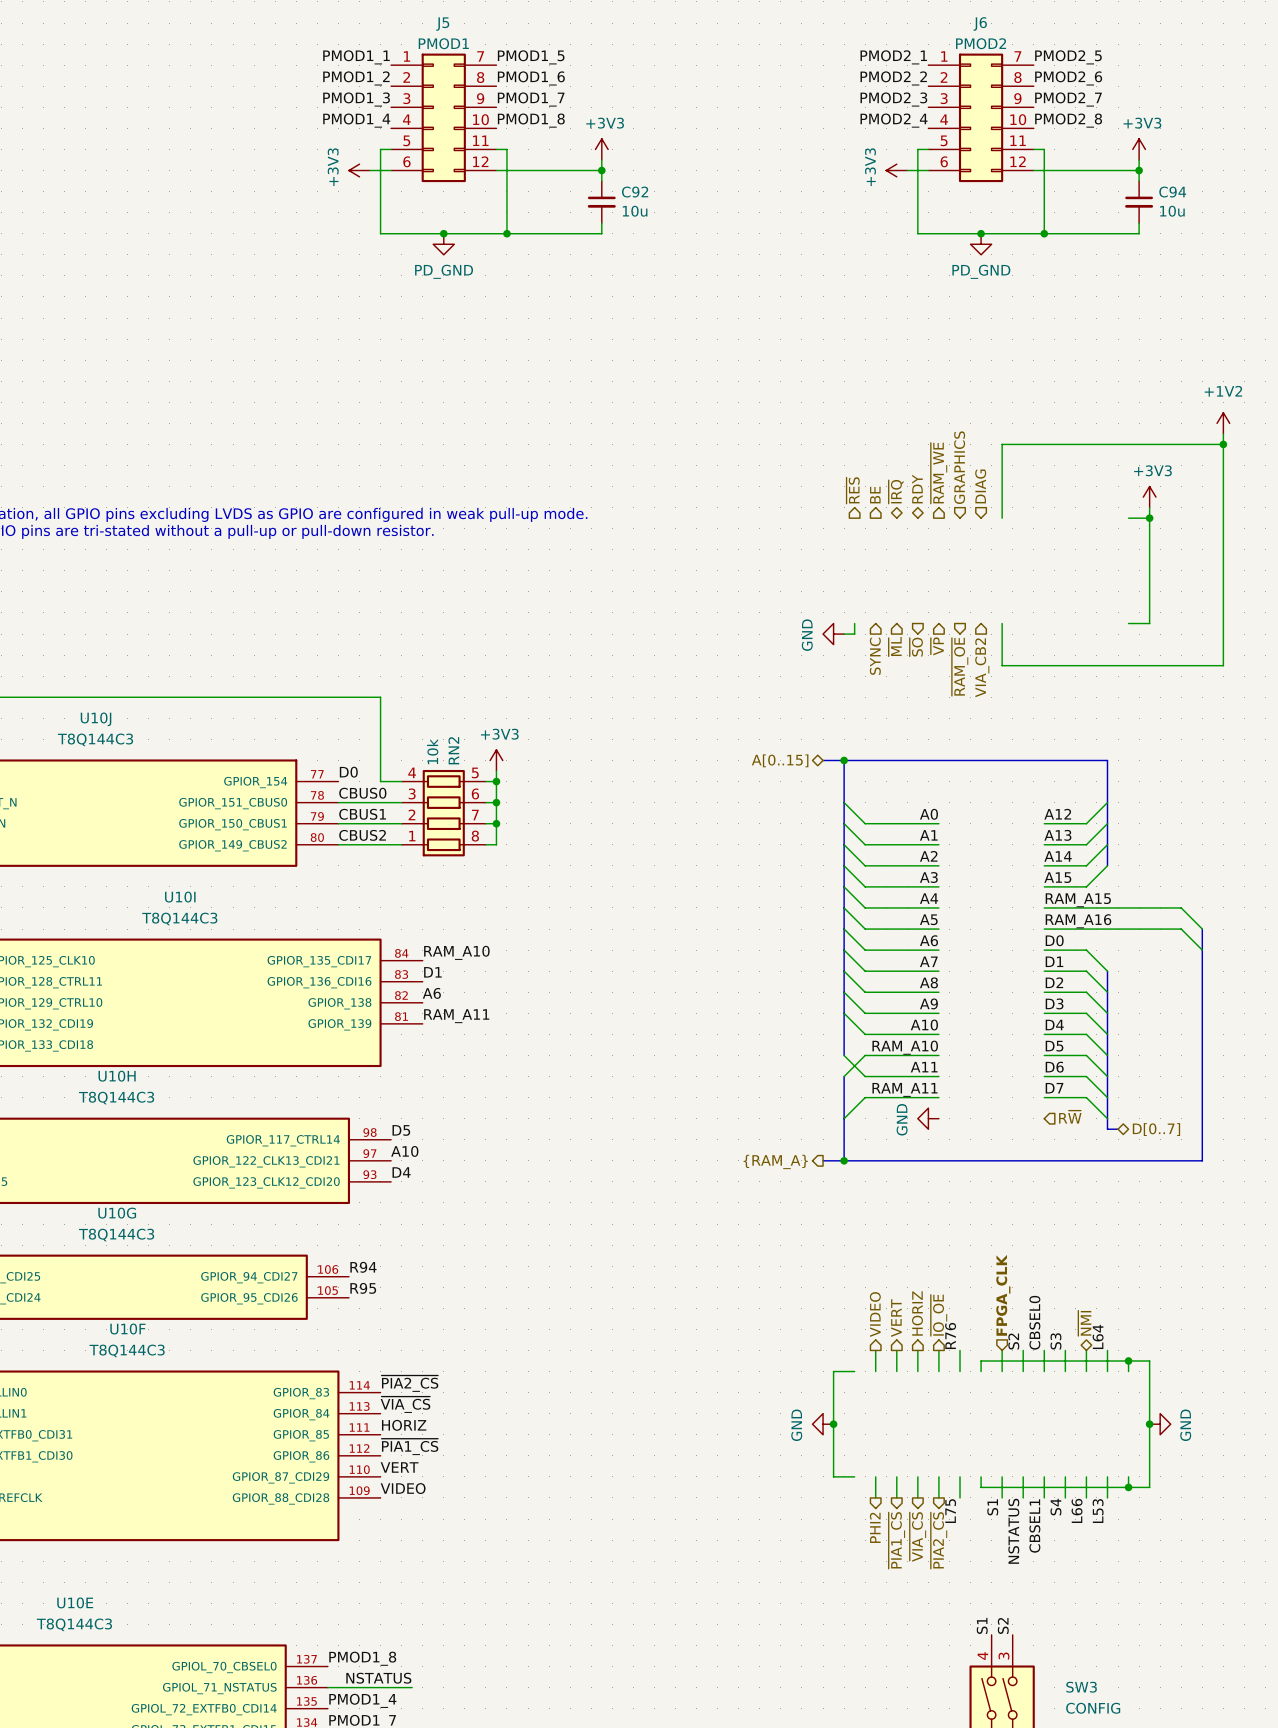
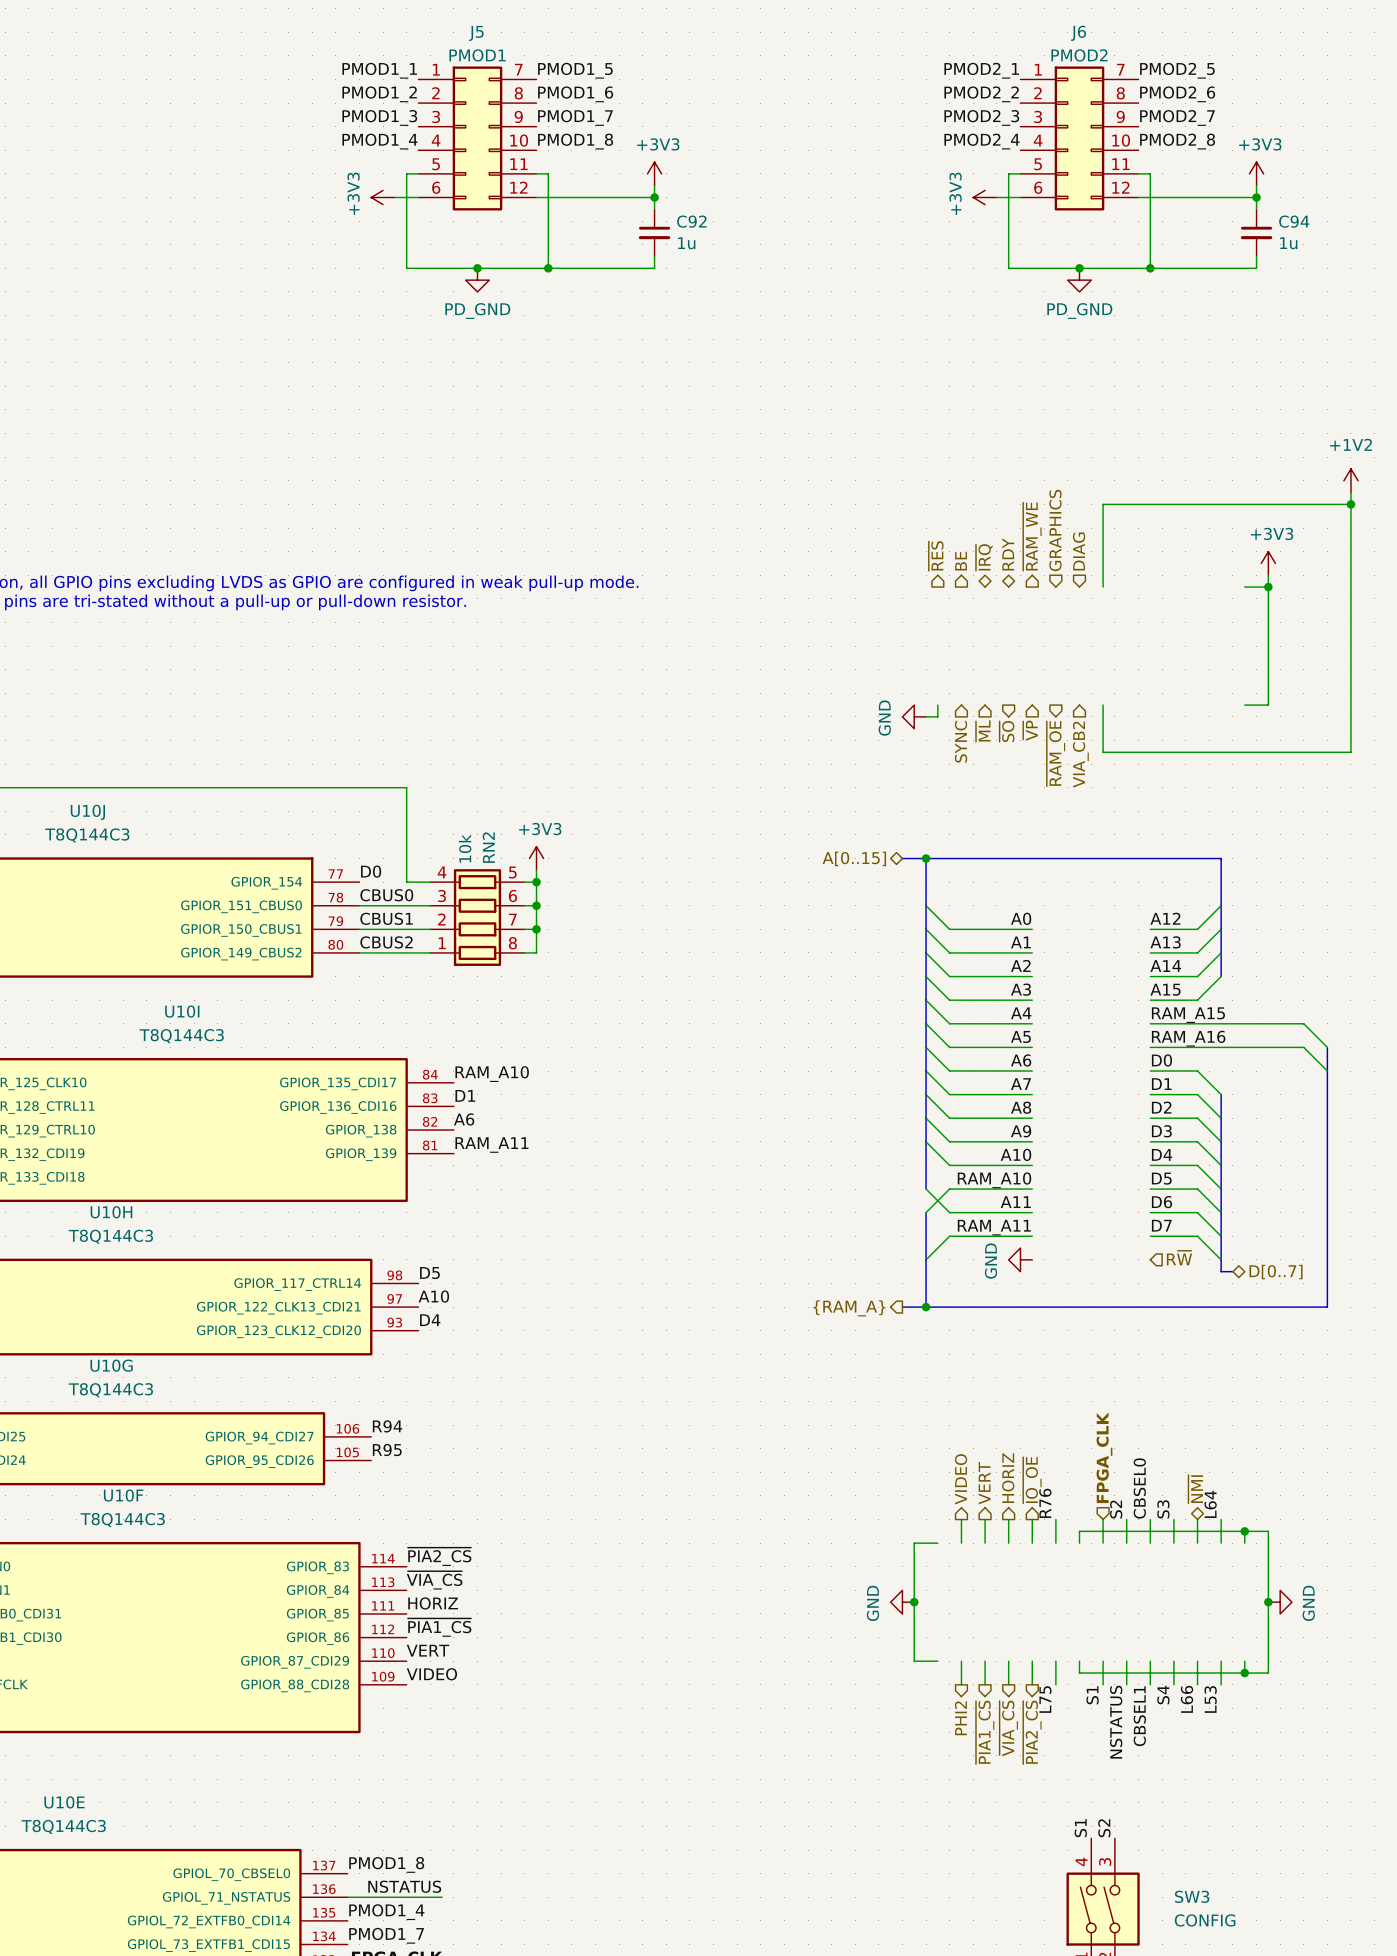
C92 value: 10u (635, 211) -> 1u (686, 243)
C94 value: 10u (1172, 211) -> 1u (1288, 243)

